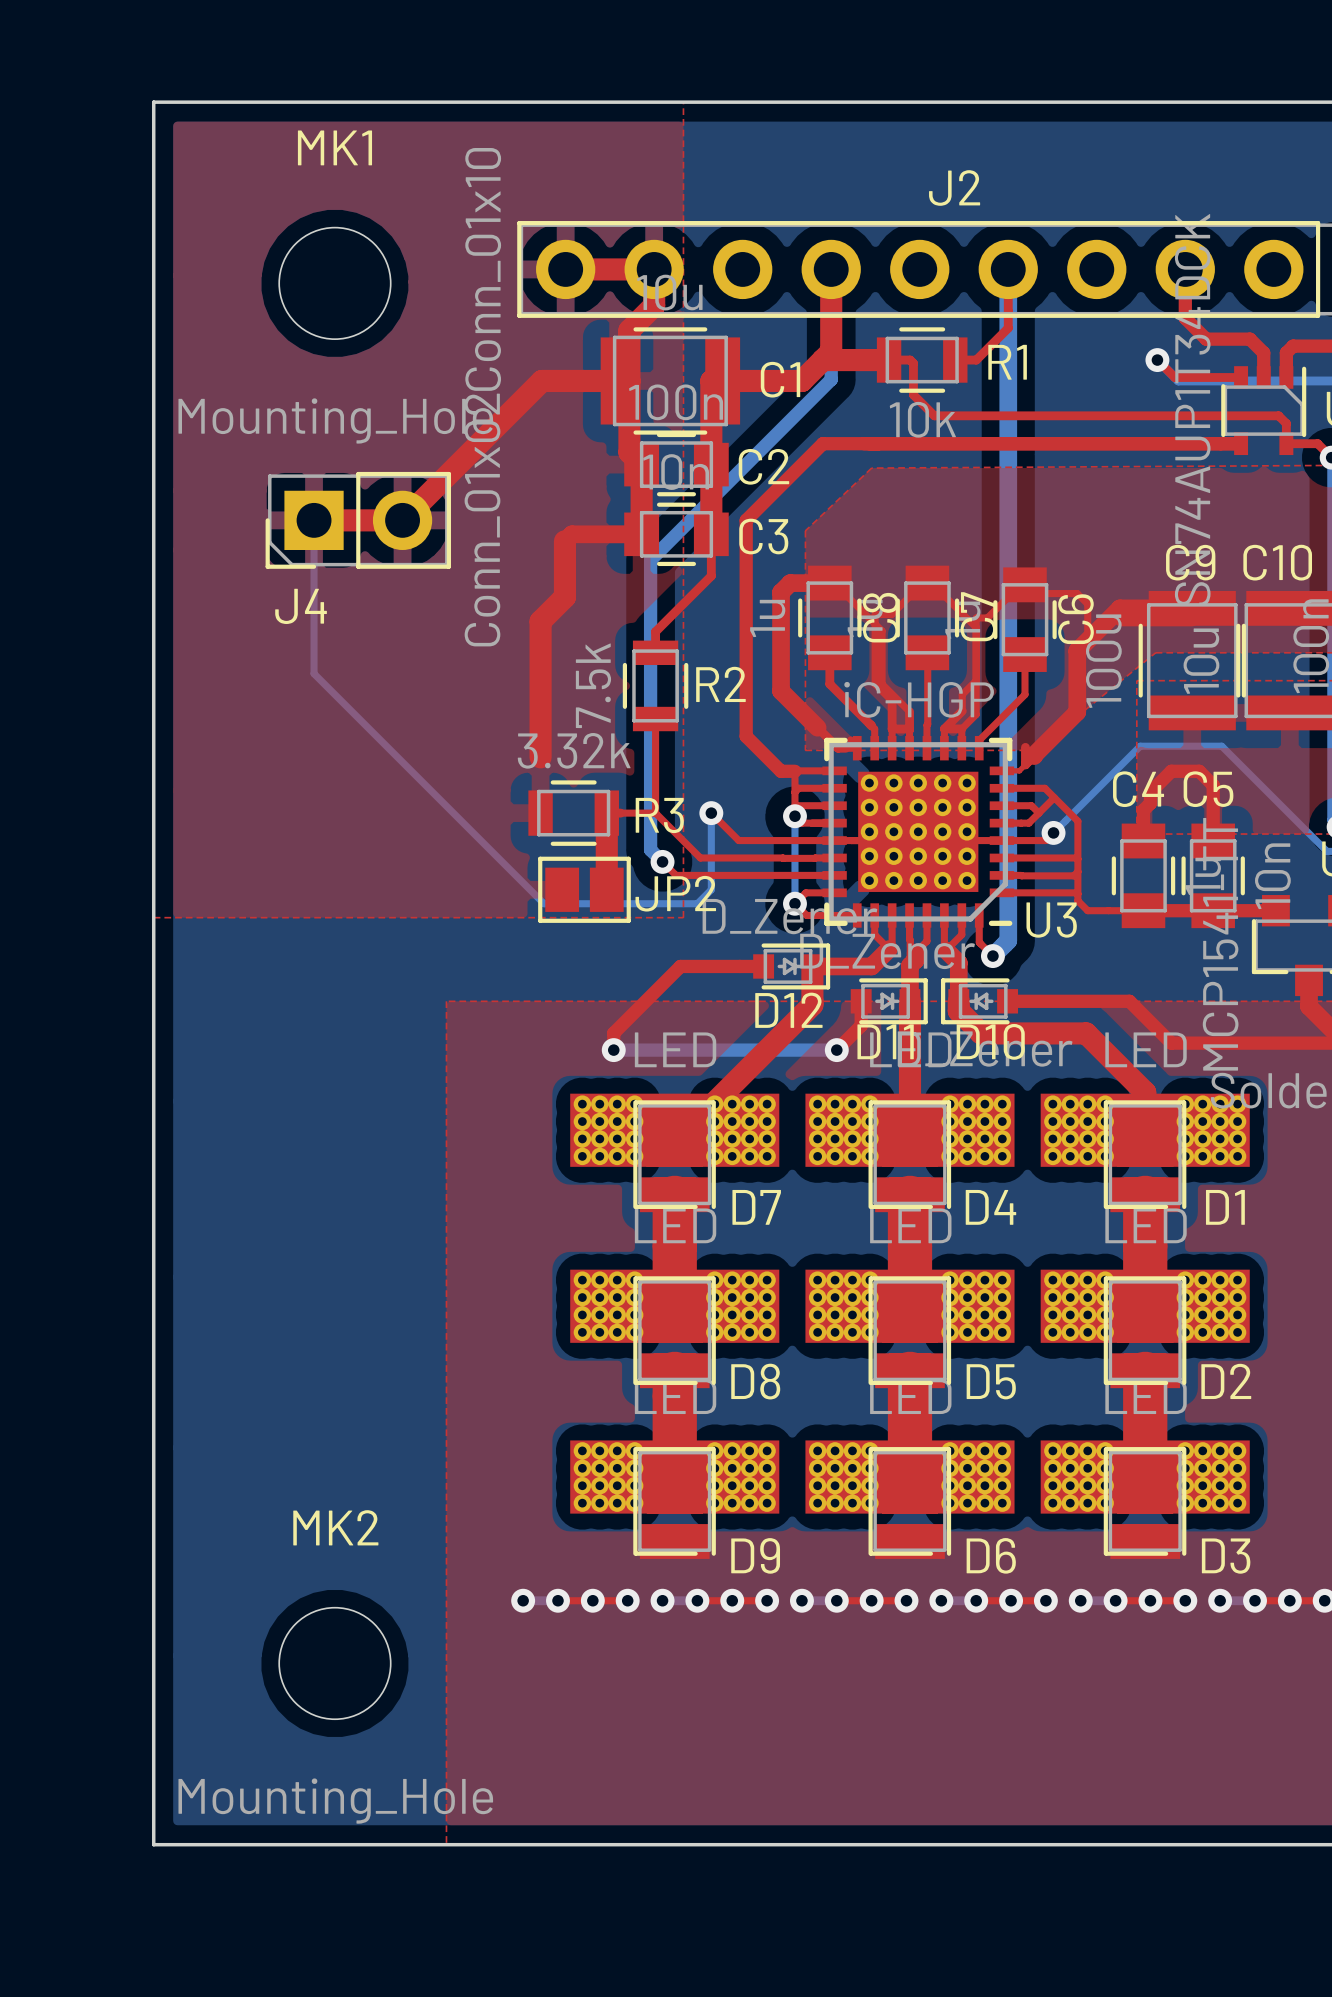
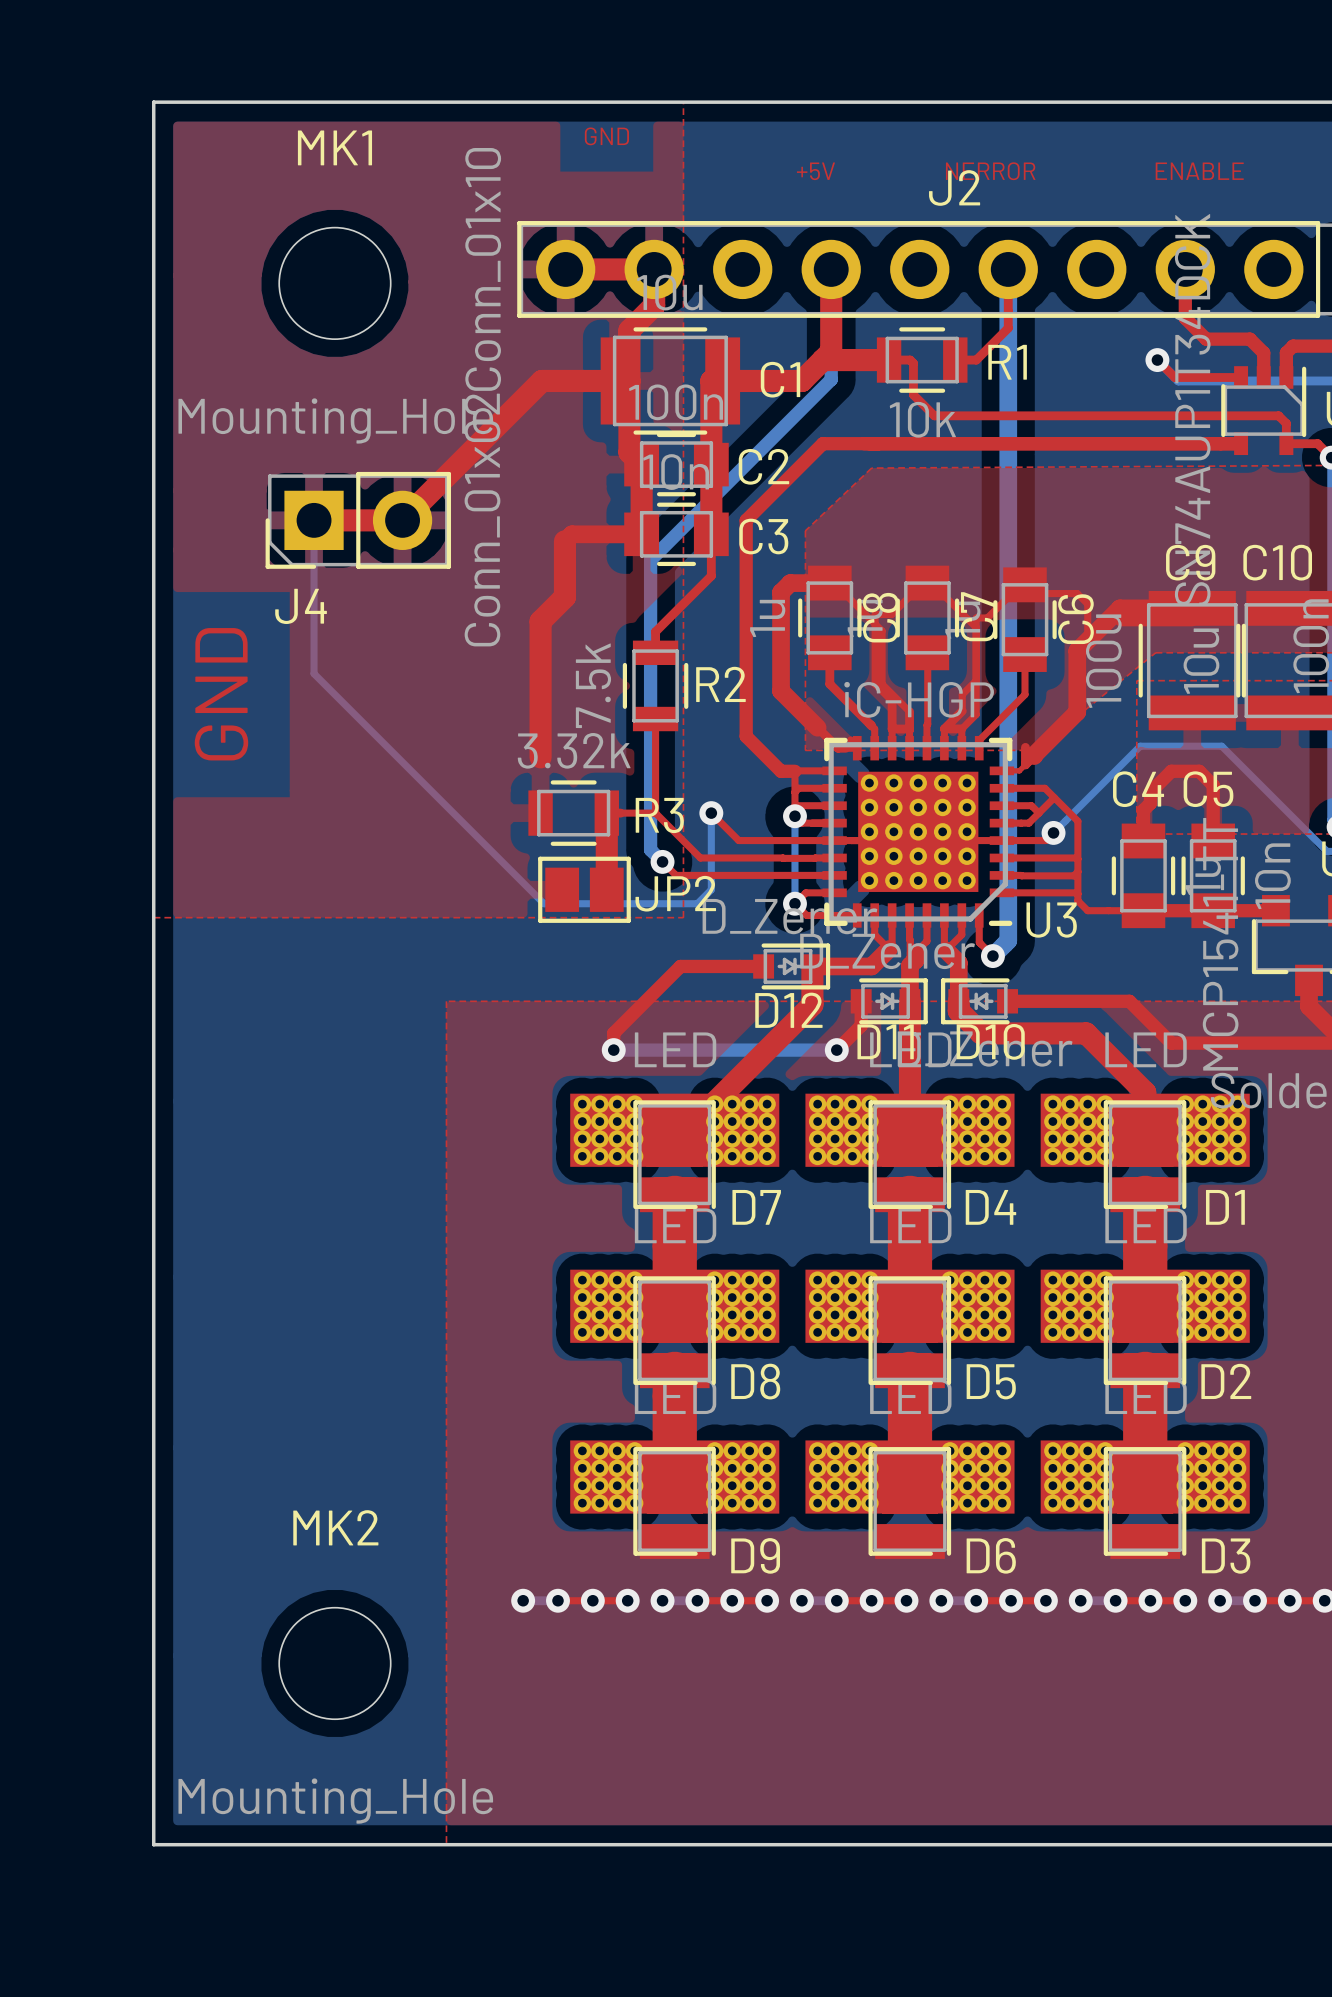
text: none -> GND (606, 136)
text: none -> +5V (815, 171)
text: none -> NERROR (990, 171)
text: none -> ENABLE (1199, 171)
text: none -> GND (221, 694)

